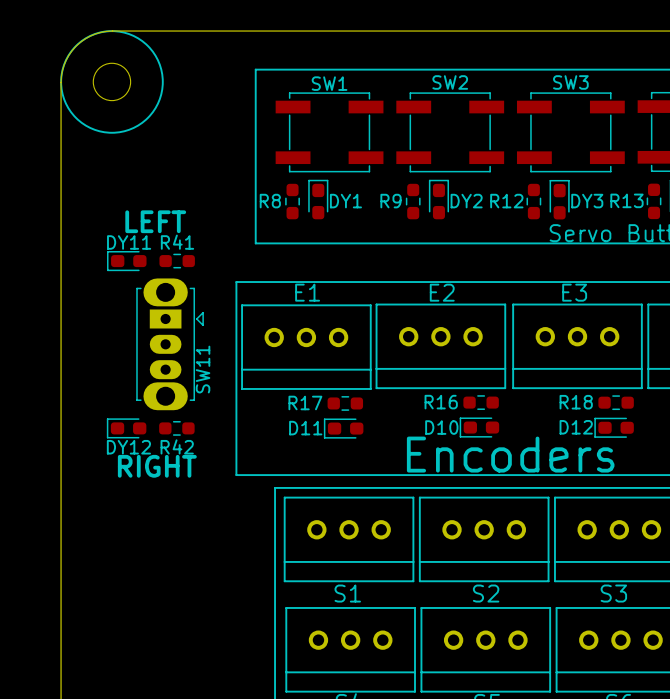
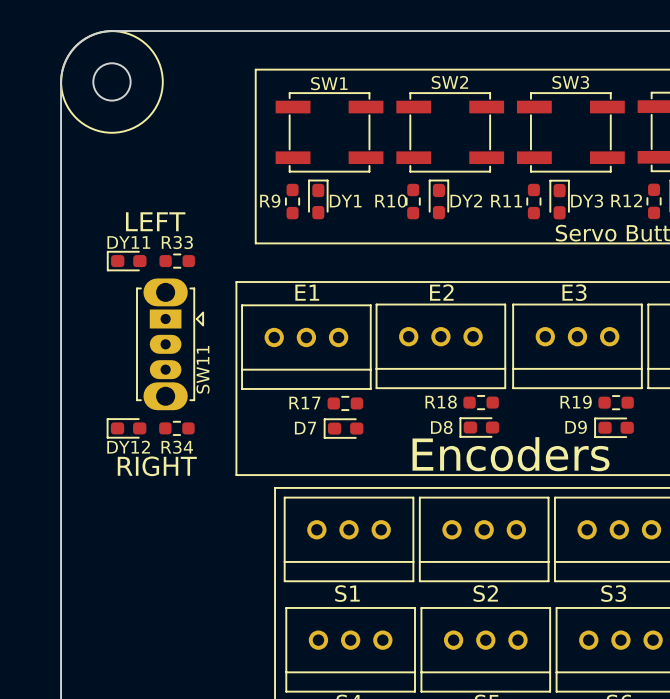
R13 name: R13 (626, 200) -> R12 (626, 200)
R8 name: R8 (270, 201) -> R9 (270, 201)
R9 name: R9 (390, 201) -> R10 (390, 201)
R12 name: R12 (506, 201) -> R11 (506, 201)
R41 name: R41 (177, 242) -> R33 (177, 242)
R16 name: R16 (441, 402) -> R18 (441, 402)
R18 name: R18 (576, 402) -> R19 (576, 402)
D10 name: D10 (441, 427) -> D8 (441, 427)
D12 name: D12 (576, 427) -> D9 (576, 427)
D11 name: D11 (305, 428) -> D7 (305, 428)
R42 name: R42 (177, 446) -> R34 (177, 447)

